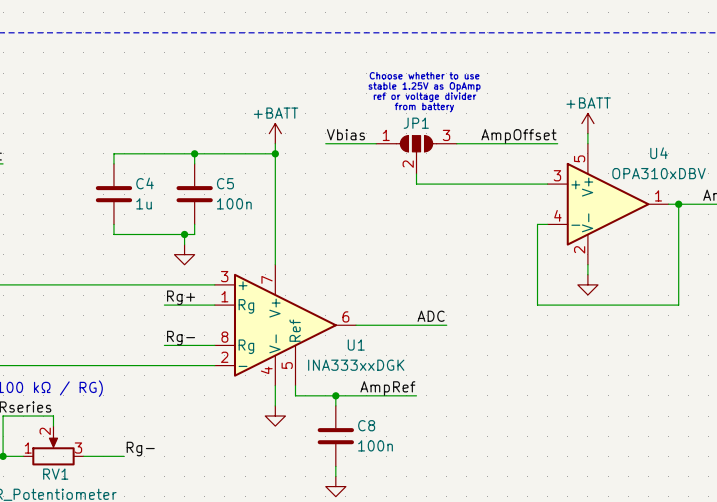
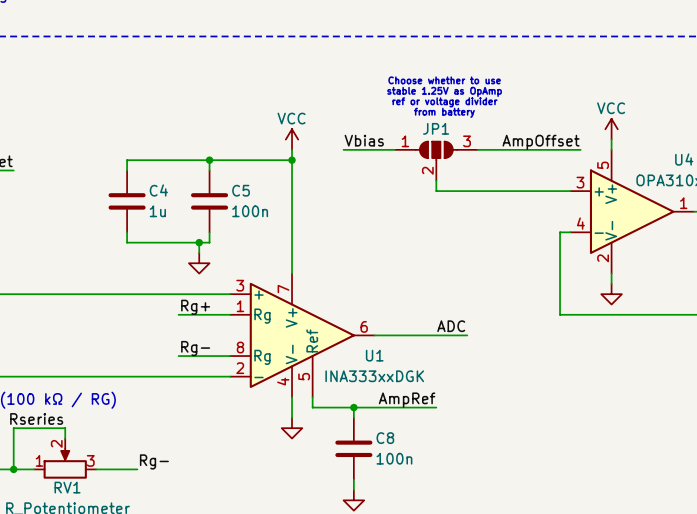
power symbol: +BATT (587, 123) -> VCC (611, 129)
power symbol: +BATT (275, 133) -> VCC (292, 139)

